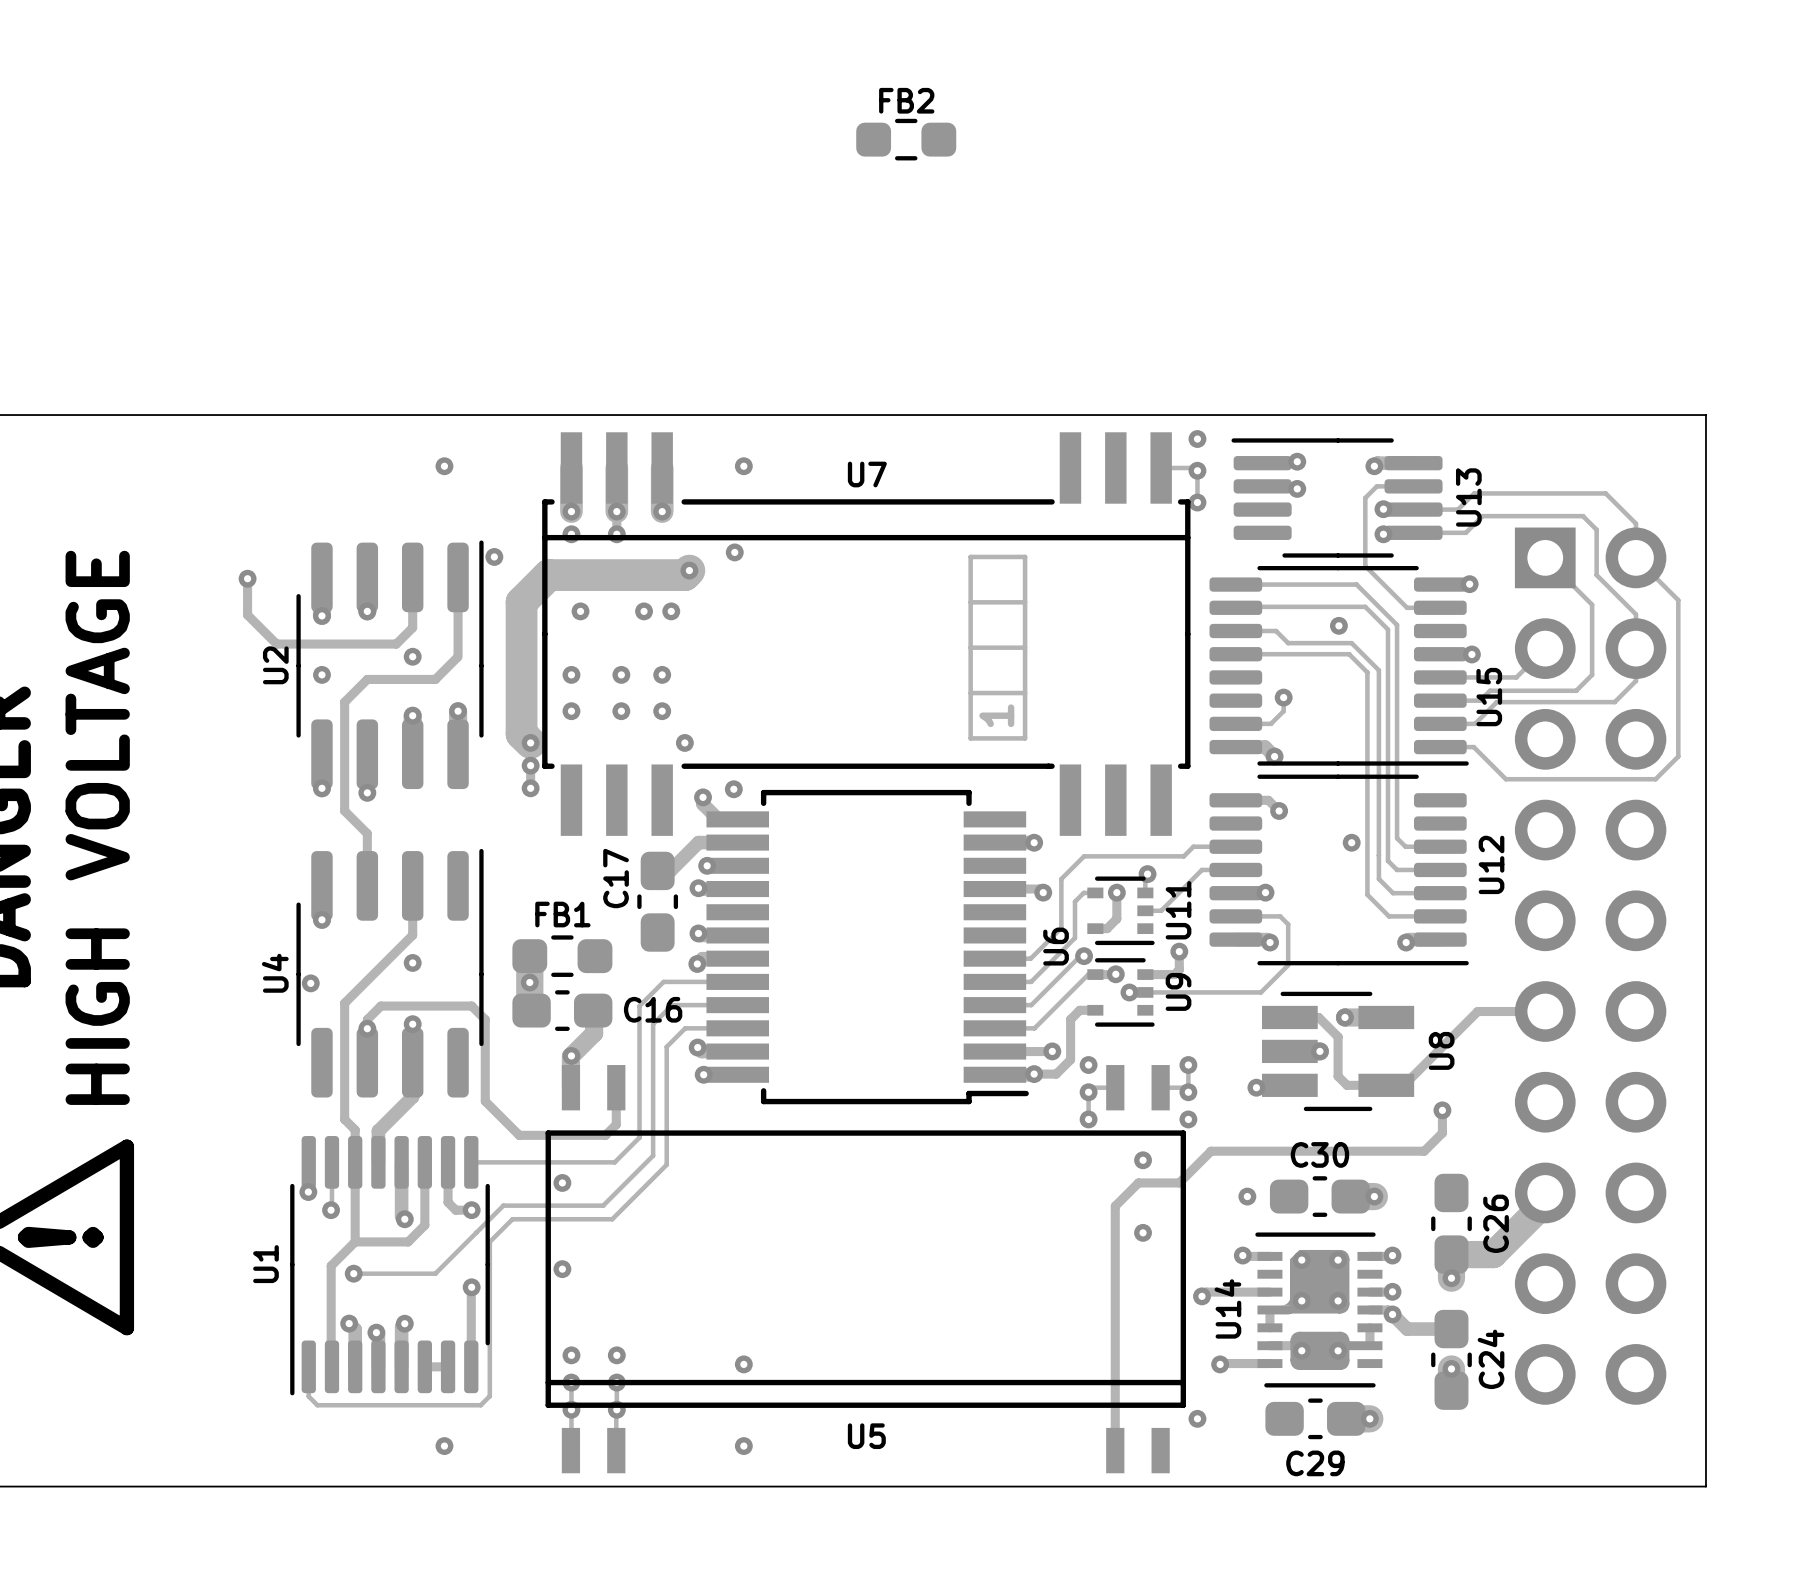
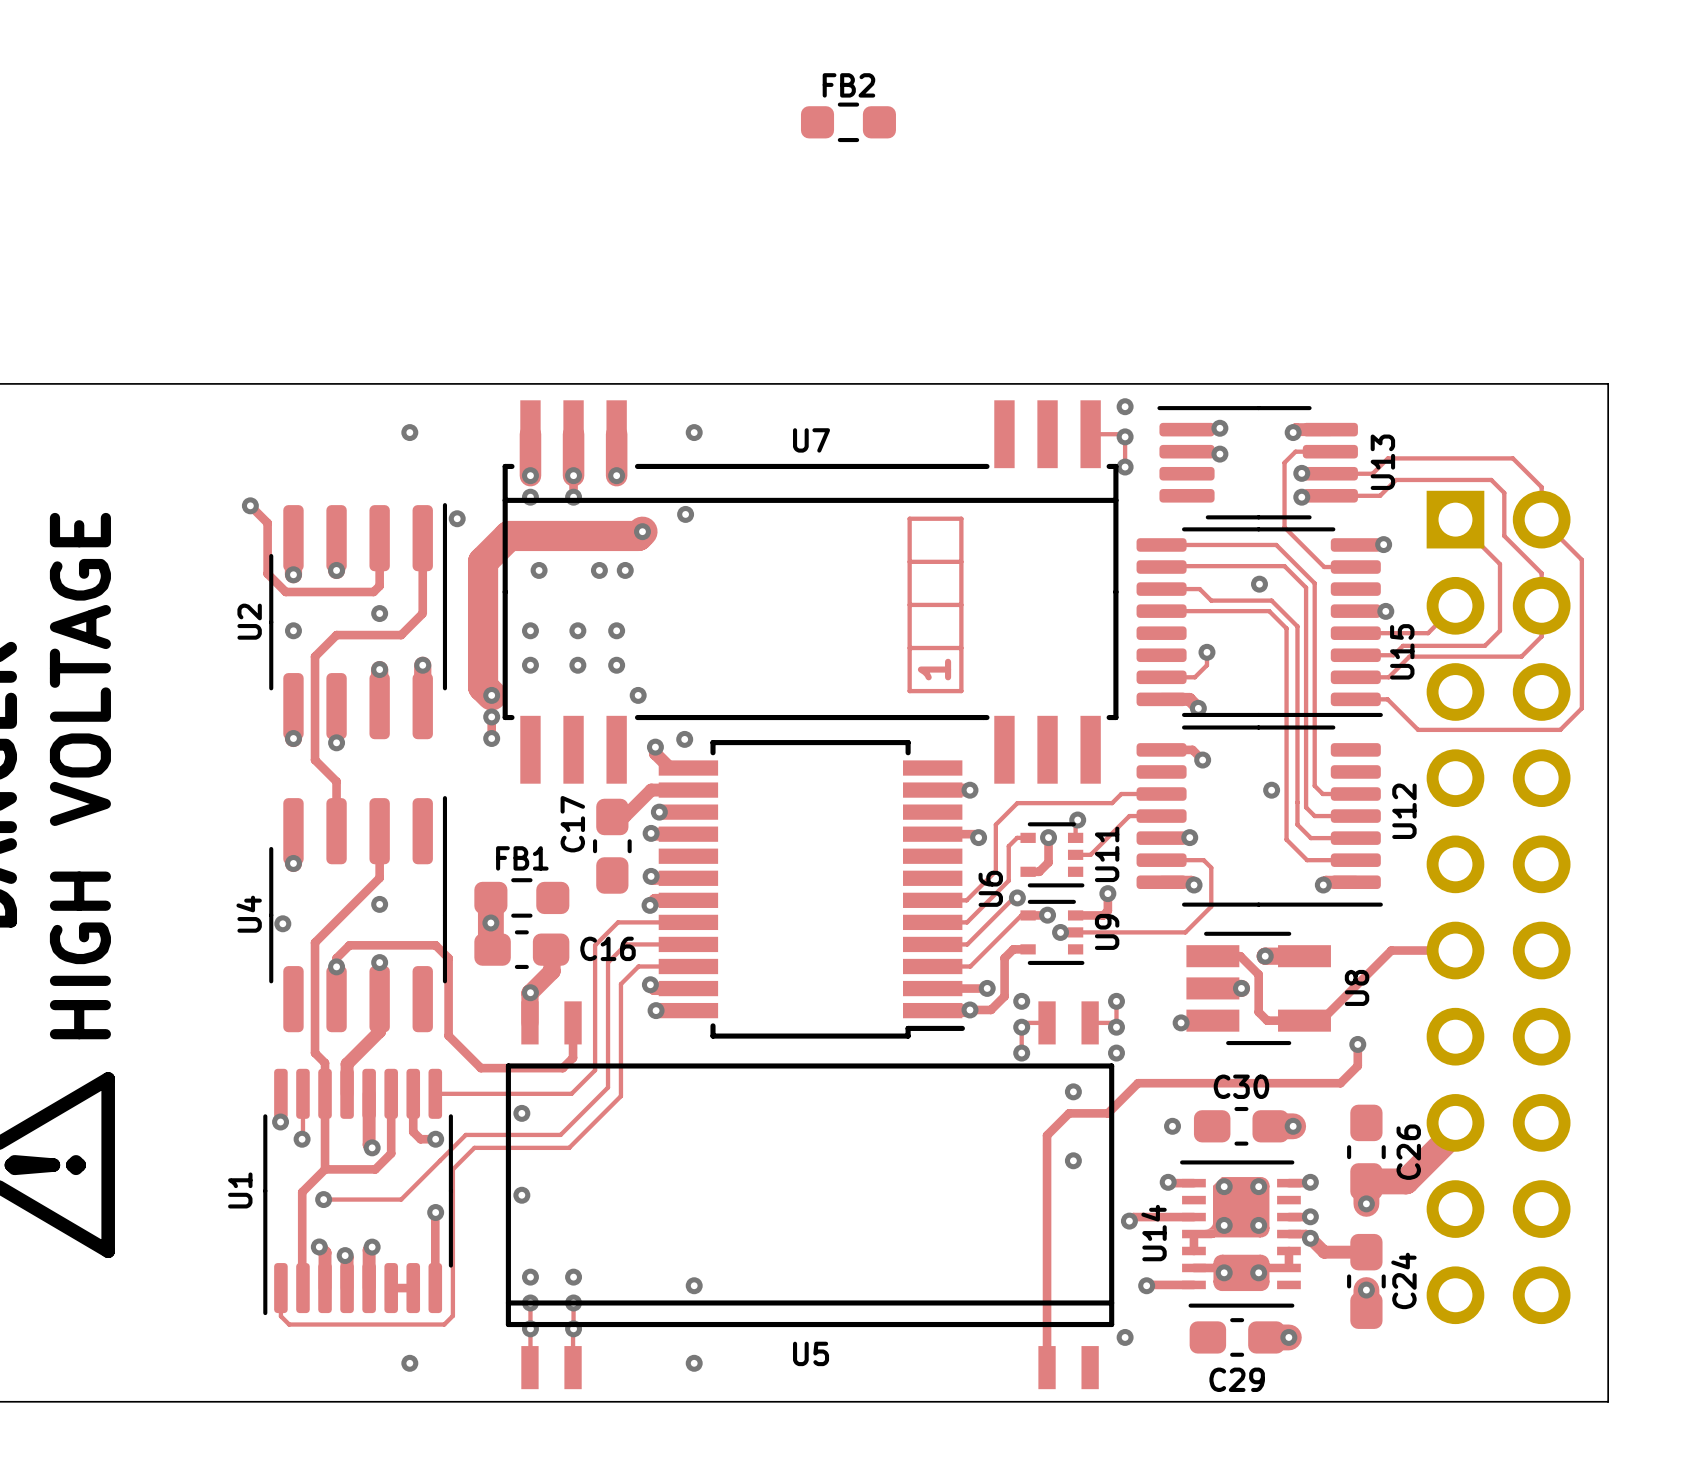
track: (247, 578) (247, 615) (276, 644) (396, 644) (406, 634) -> (250, 505) (267, 523) (267, 573) (285, 591) (373, 591)
via position: (247, 578) -> (250, 505)

